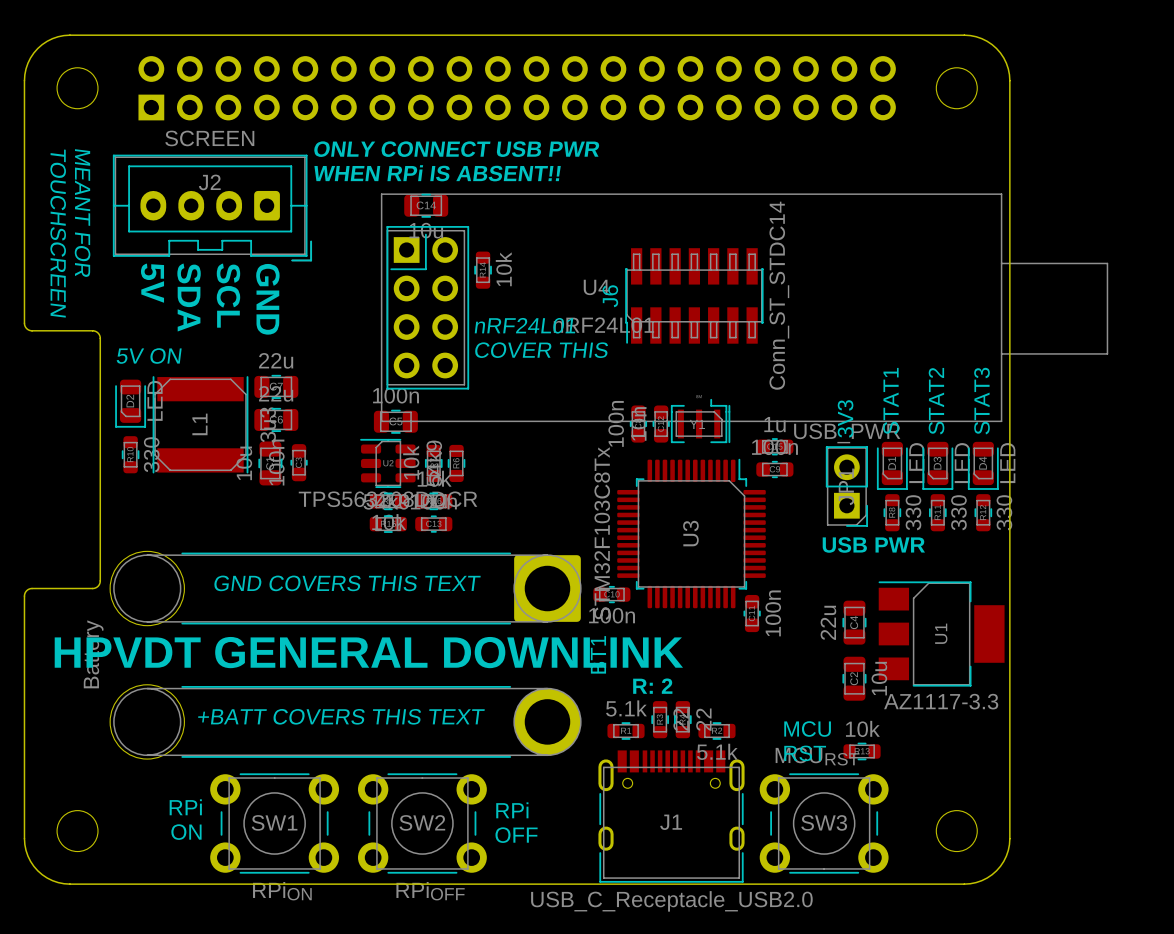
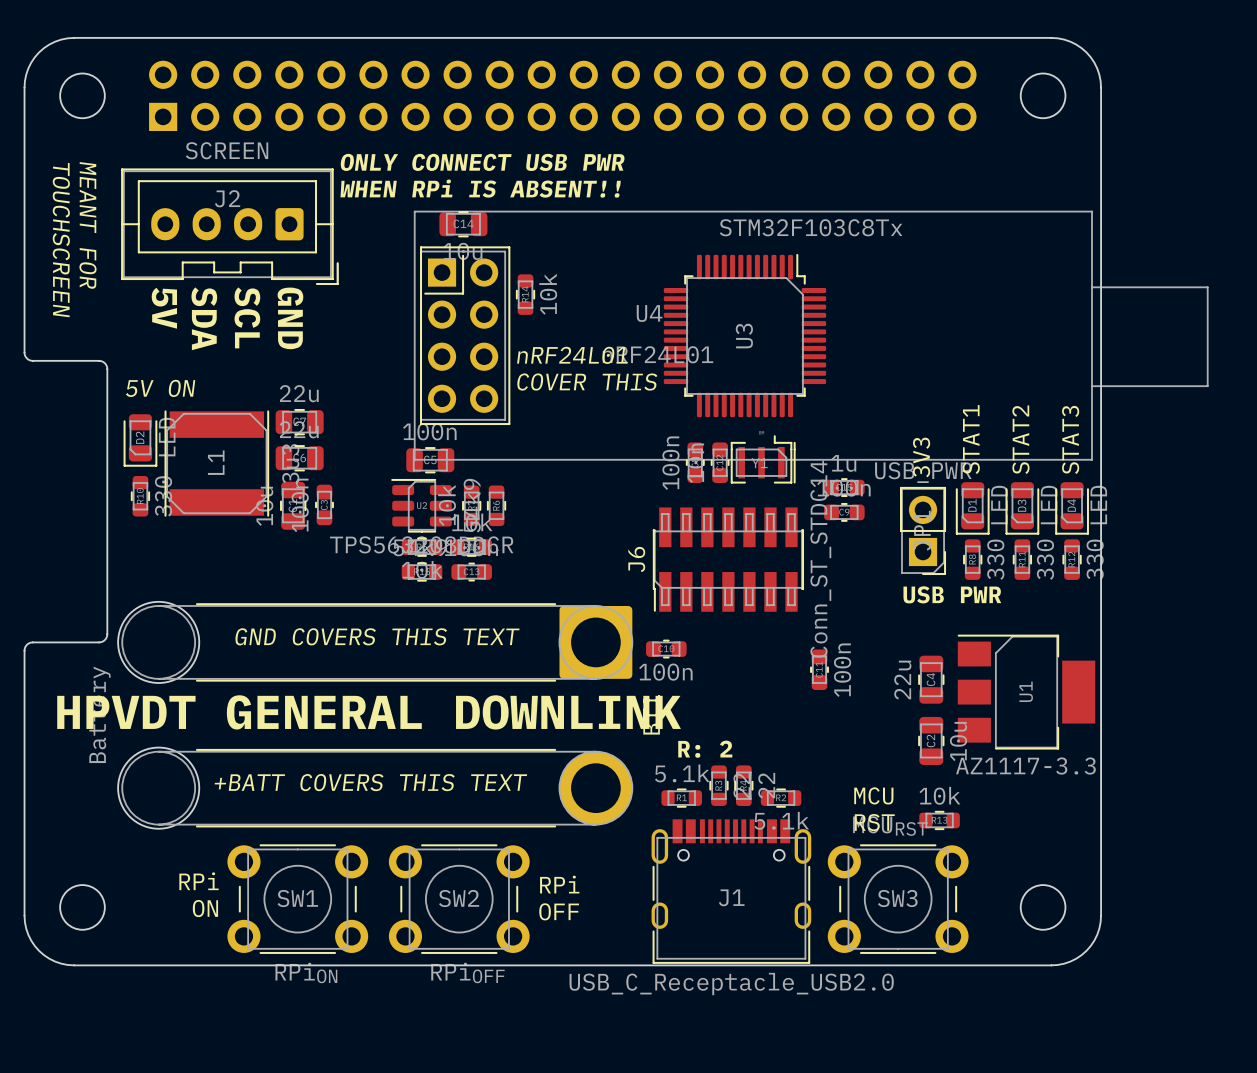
J6 position: (694, 295) -> (728, 559)
U3 value rotation: 0° (602, 533) -> 90° clockwise (811, 227)
U3 position: (691, 533) -> (744, 335)

